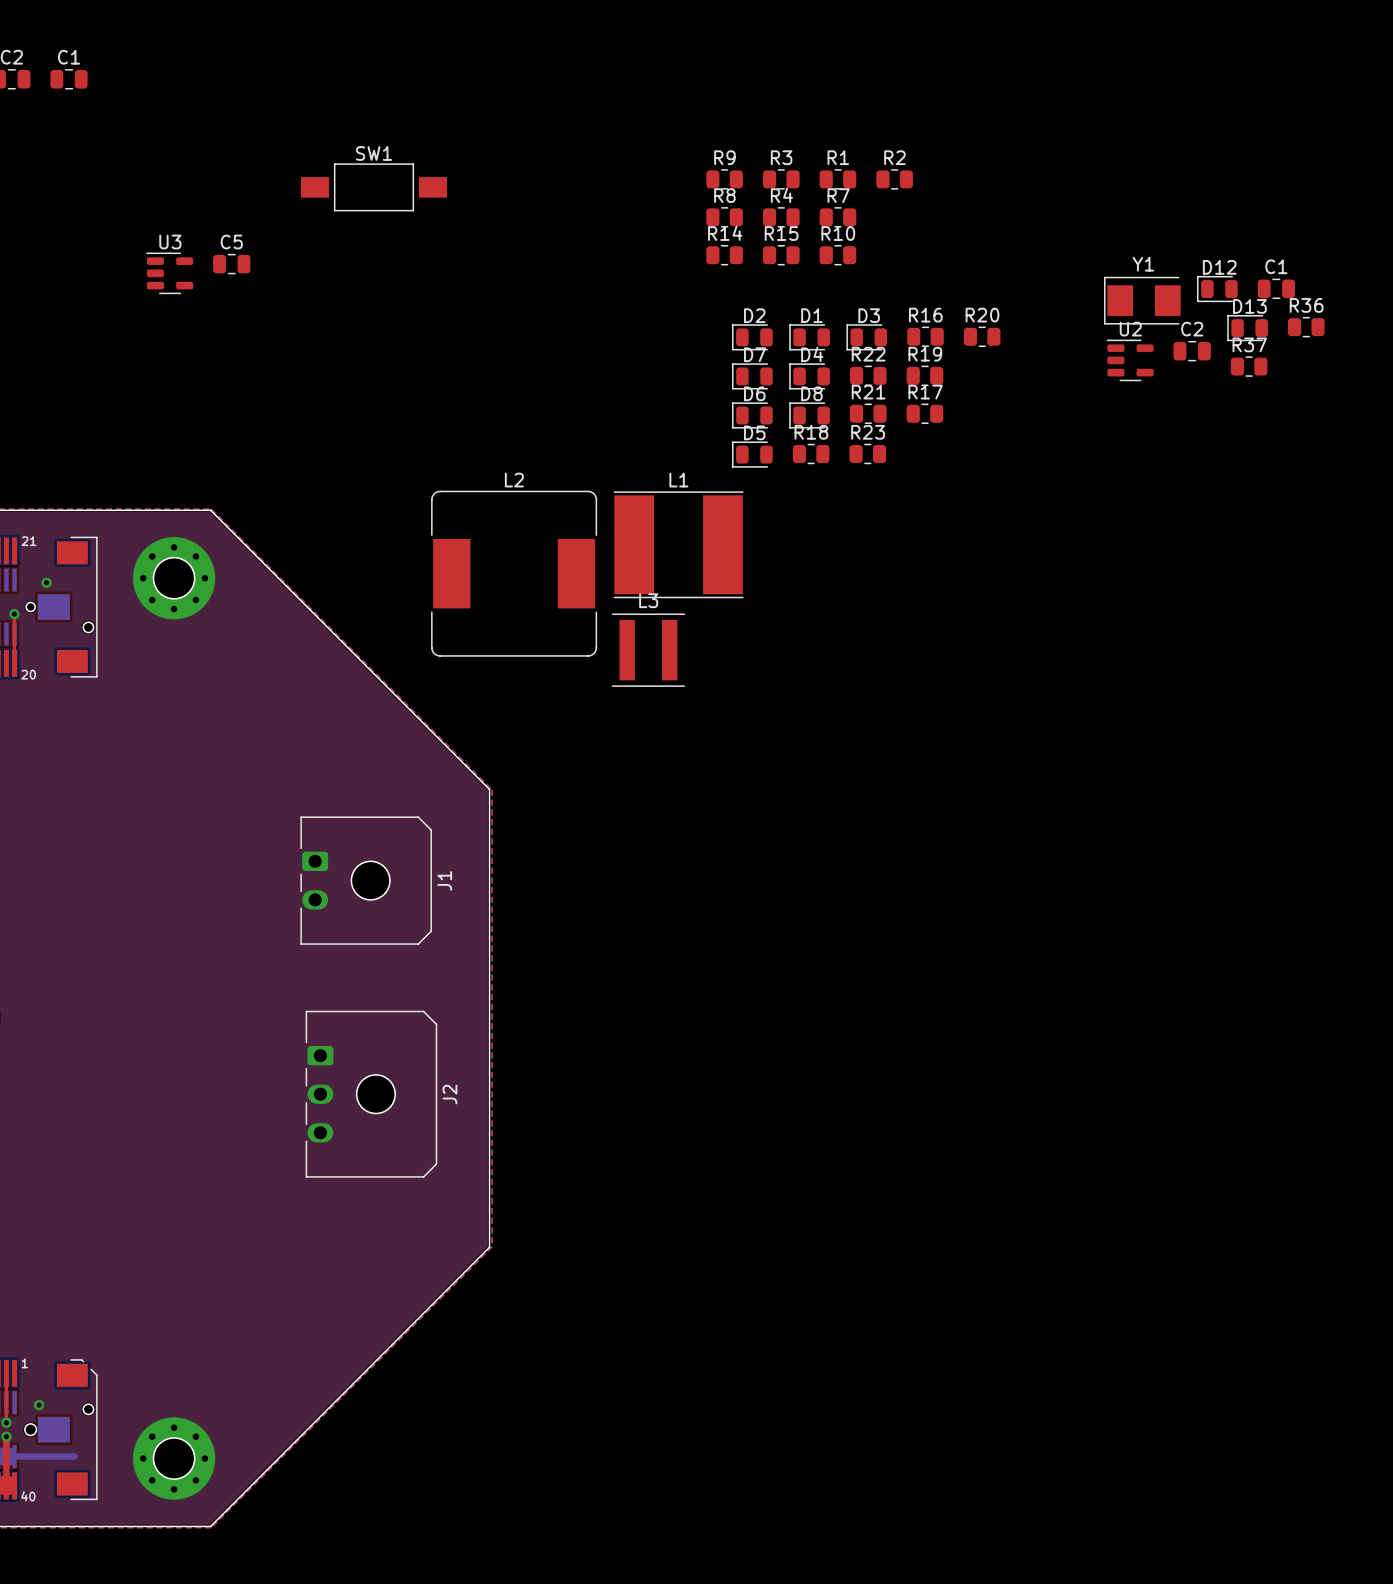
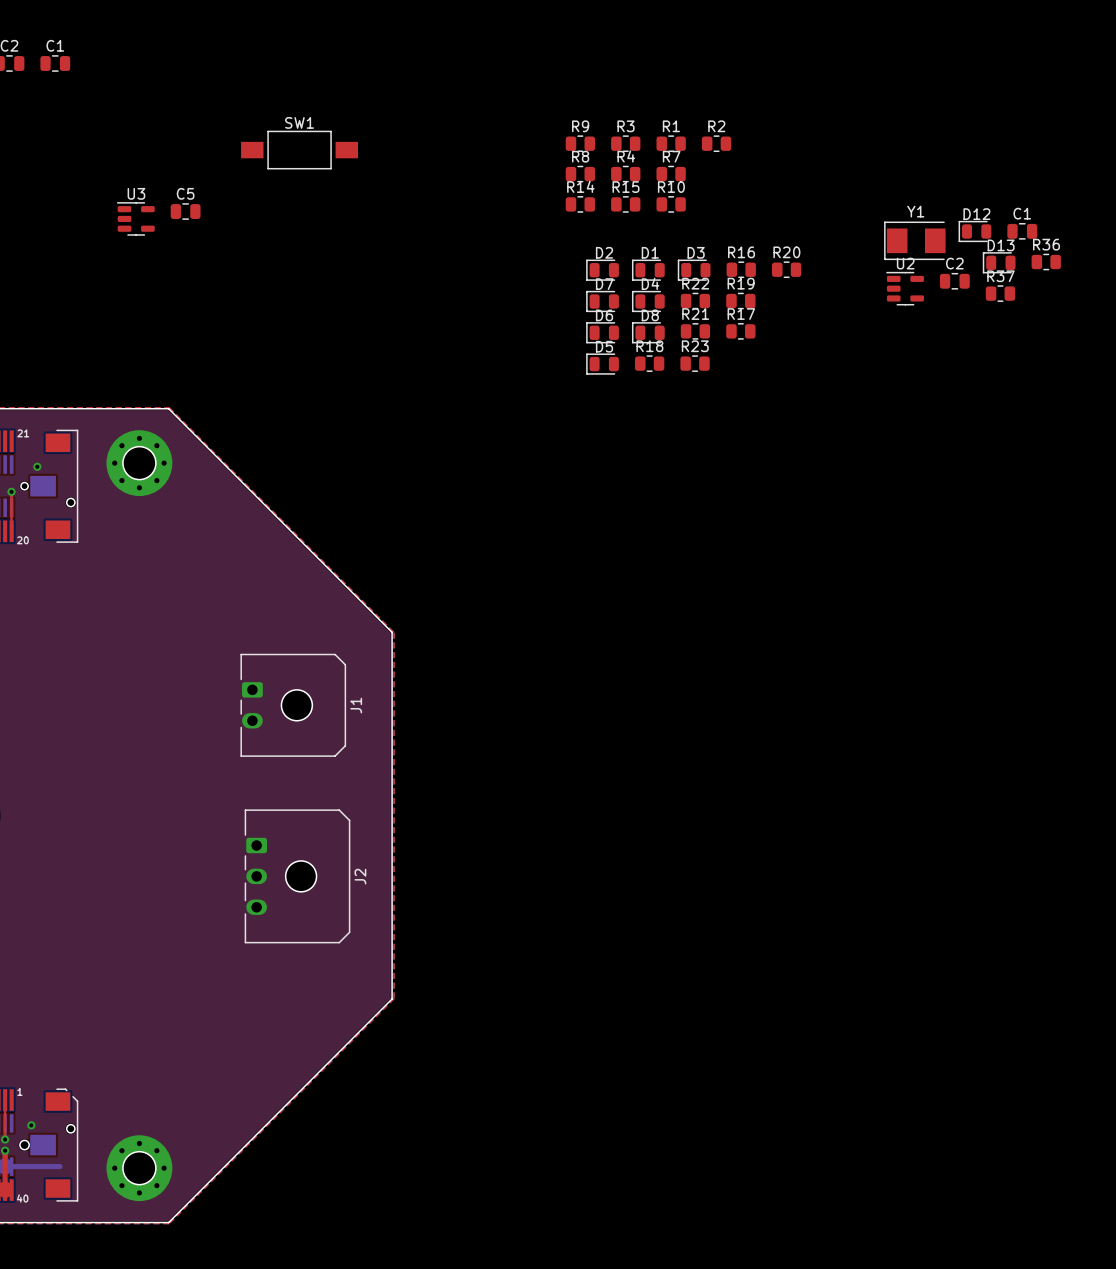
L1: (678, 544) -> none
L2: (514, 573) -> none
L3: (648, 650) -> none

